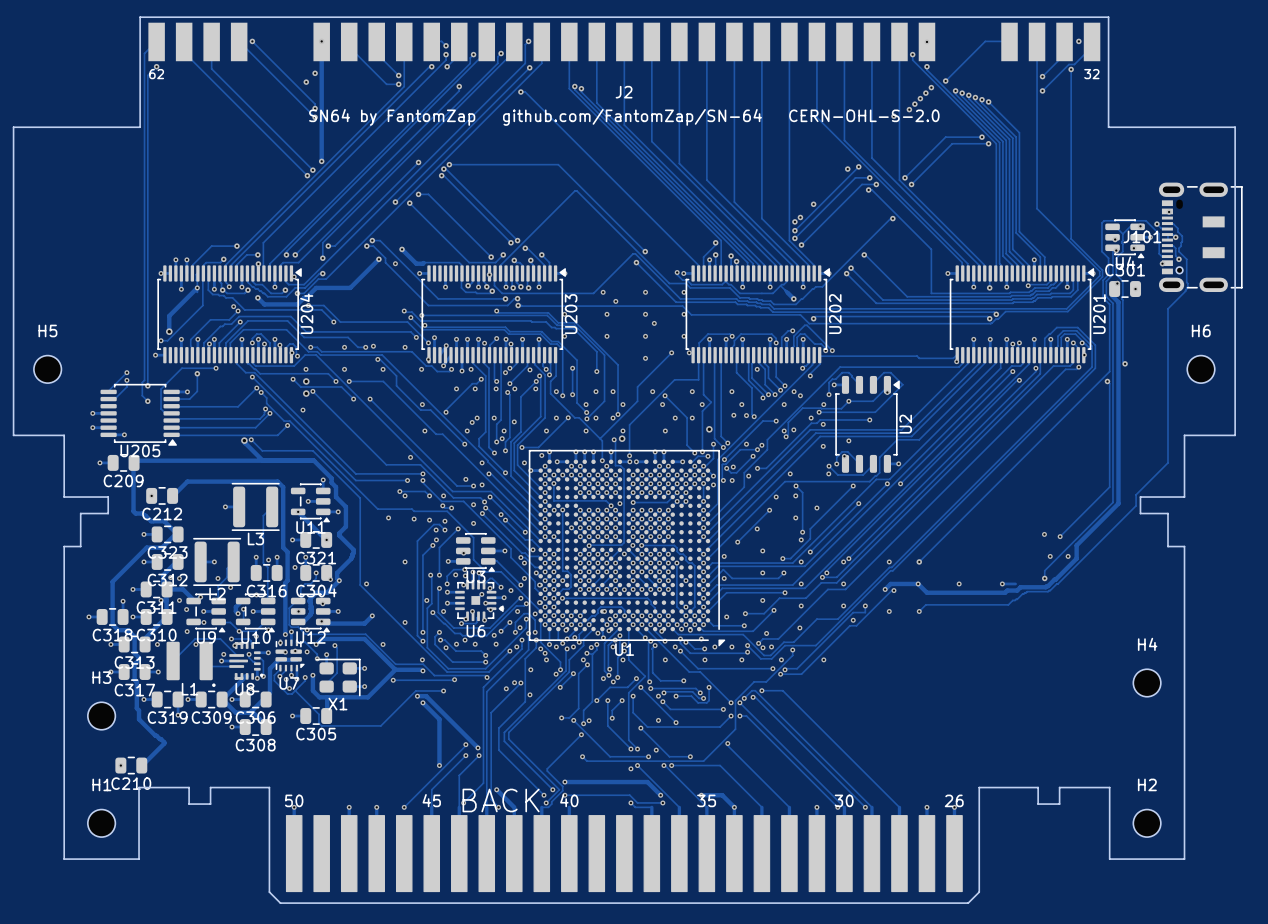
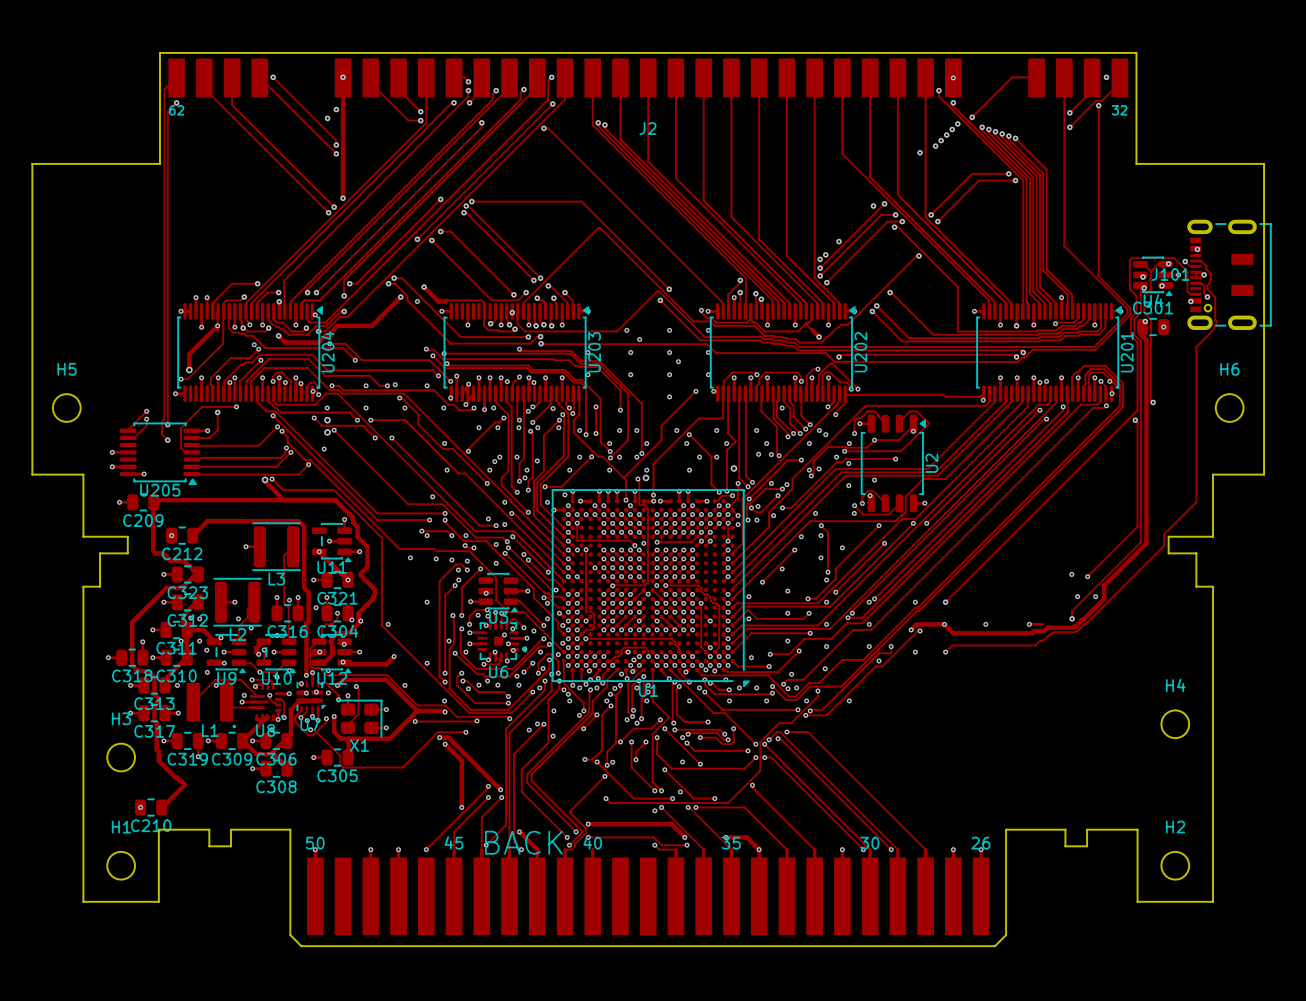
text: SN64 by FantomZap github.com/FantomZap/SN-64 CERN-OHL-S-2.0 (624, 117) -> none

